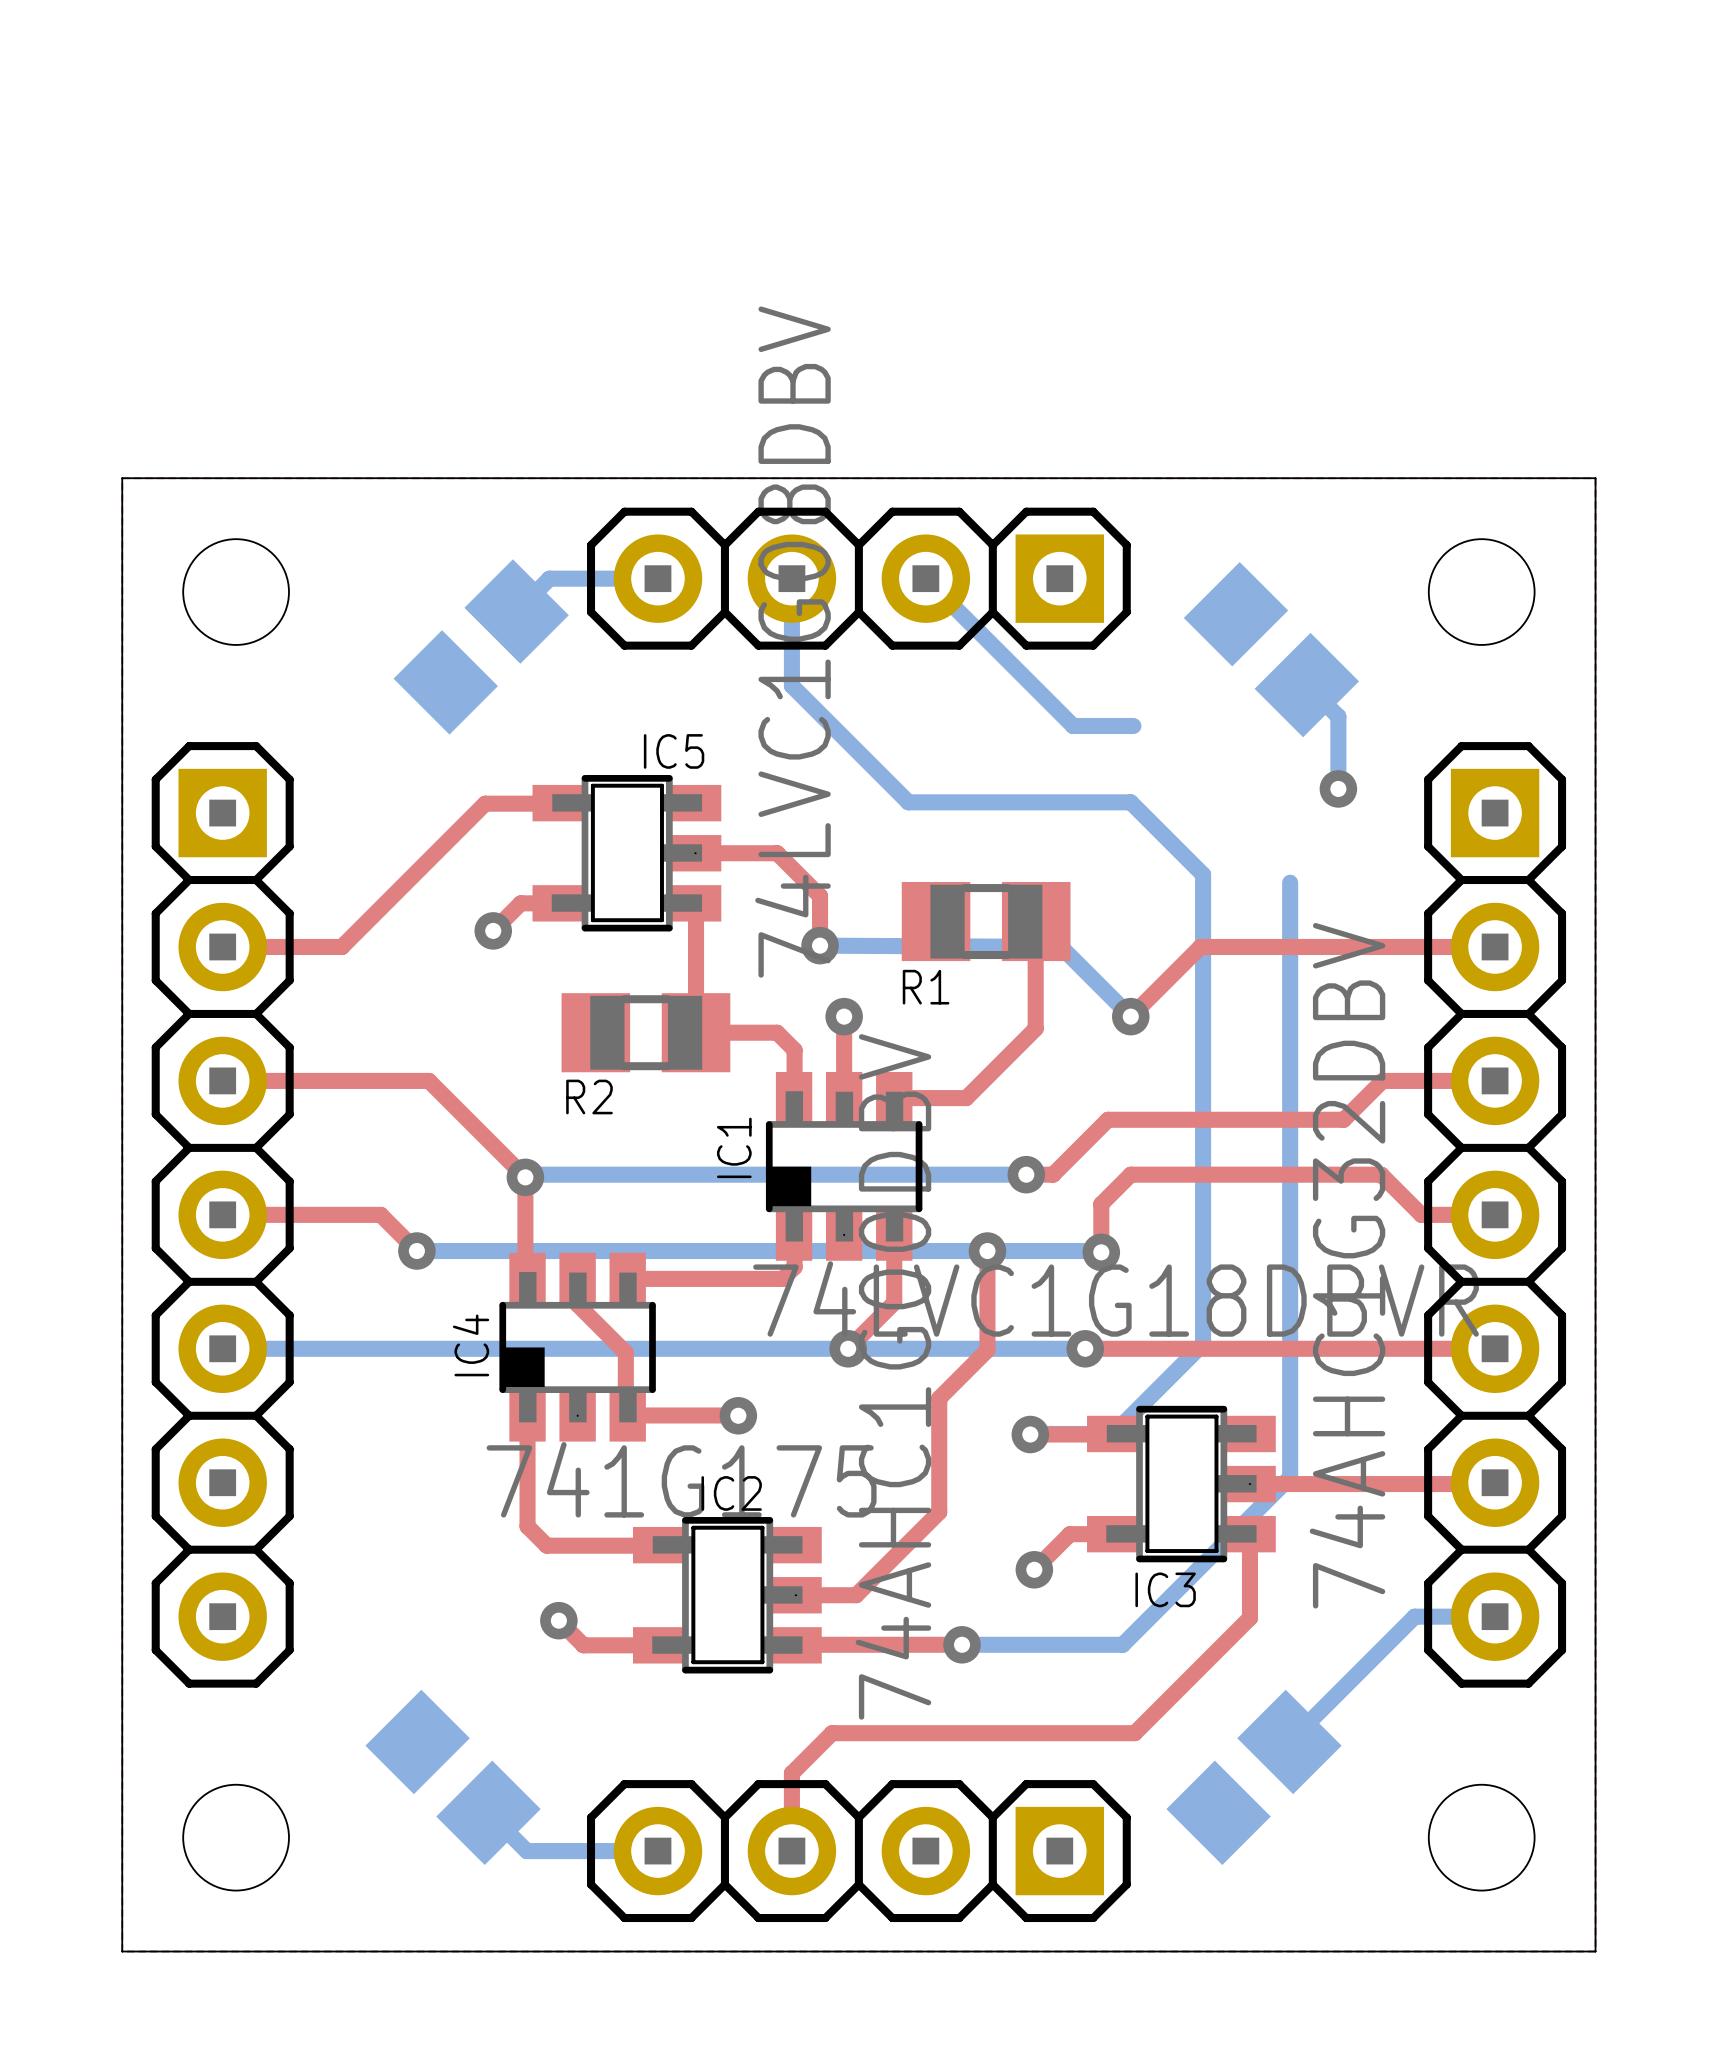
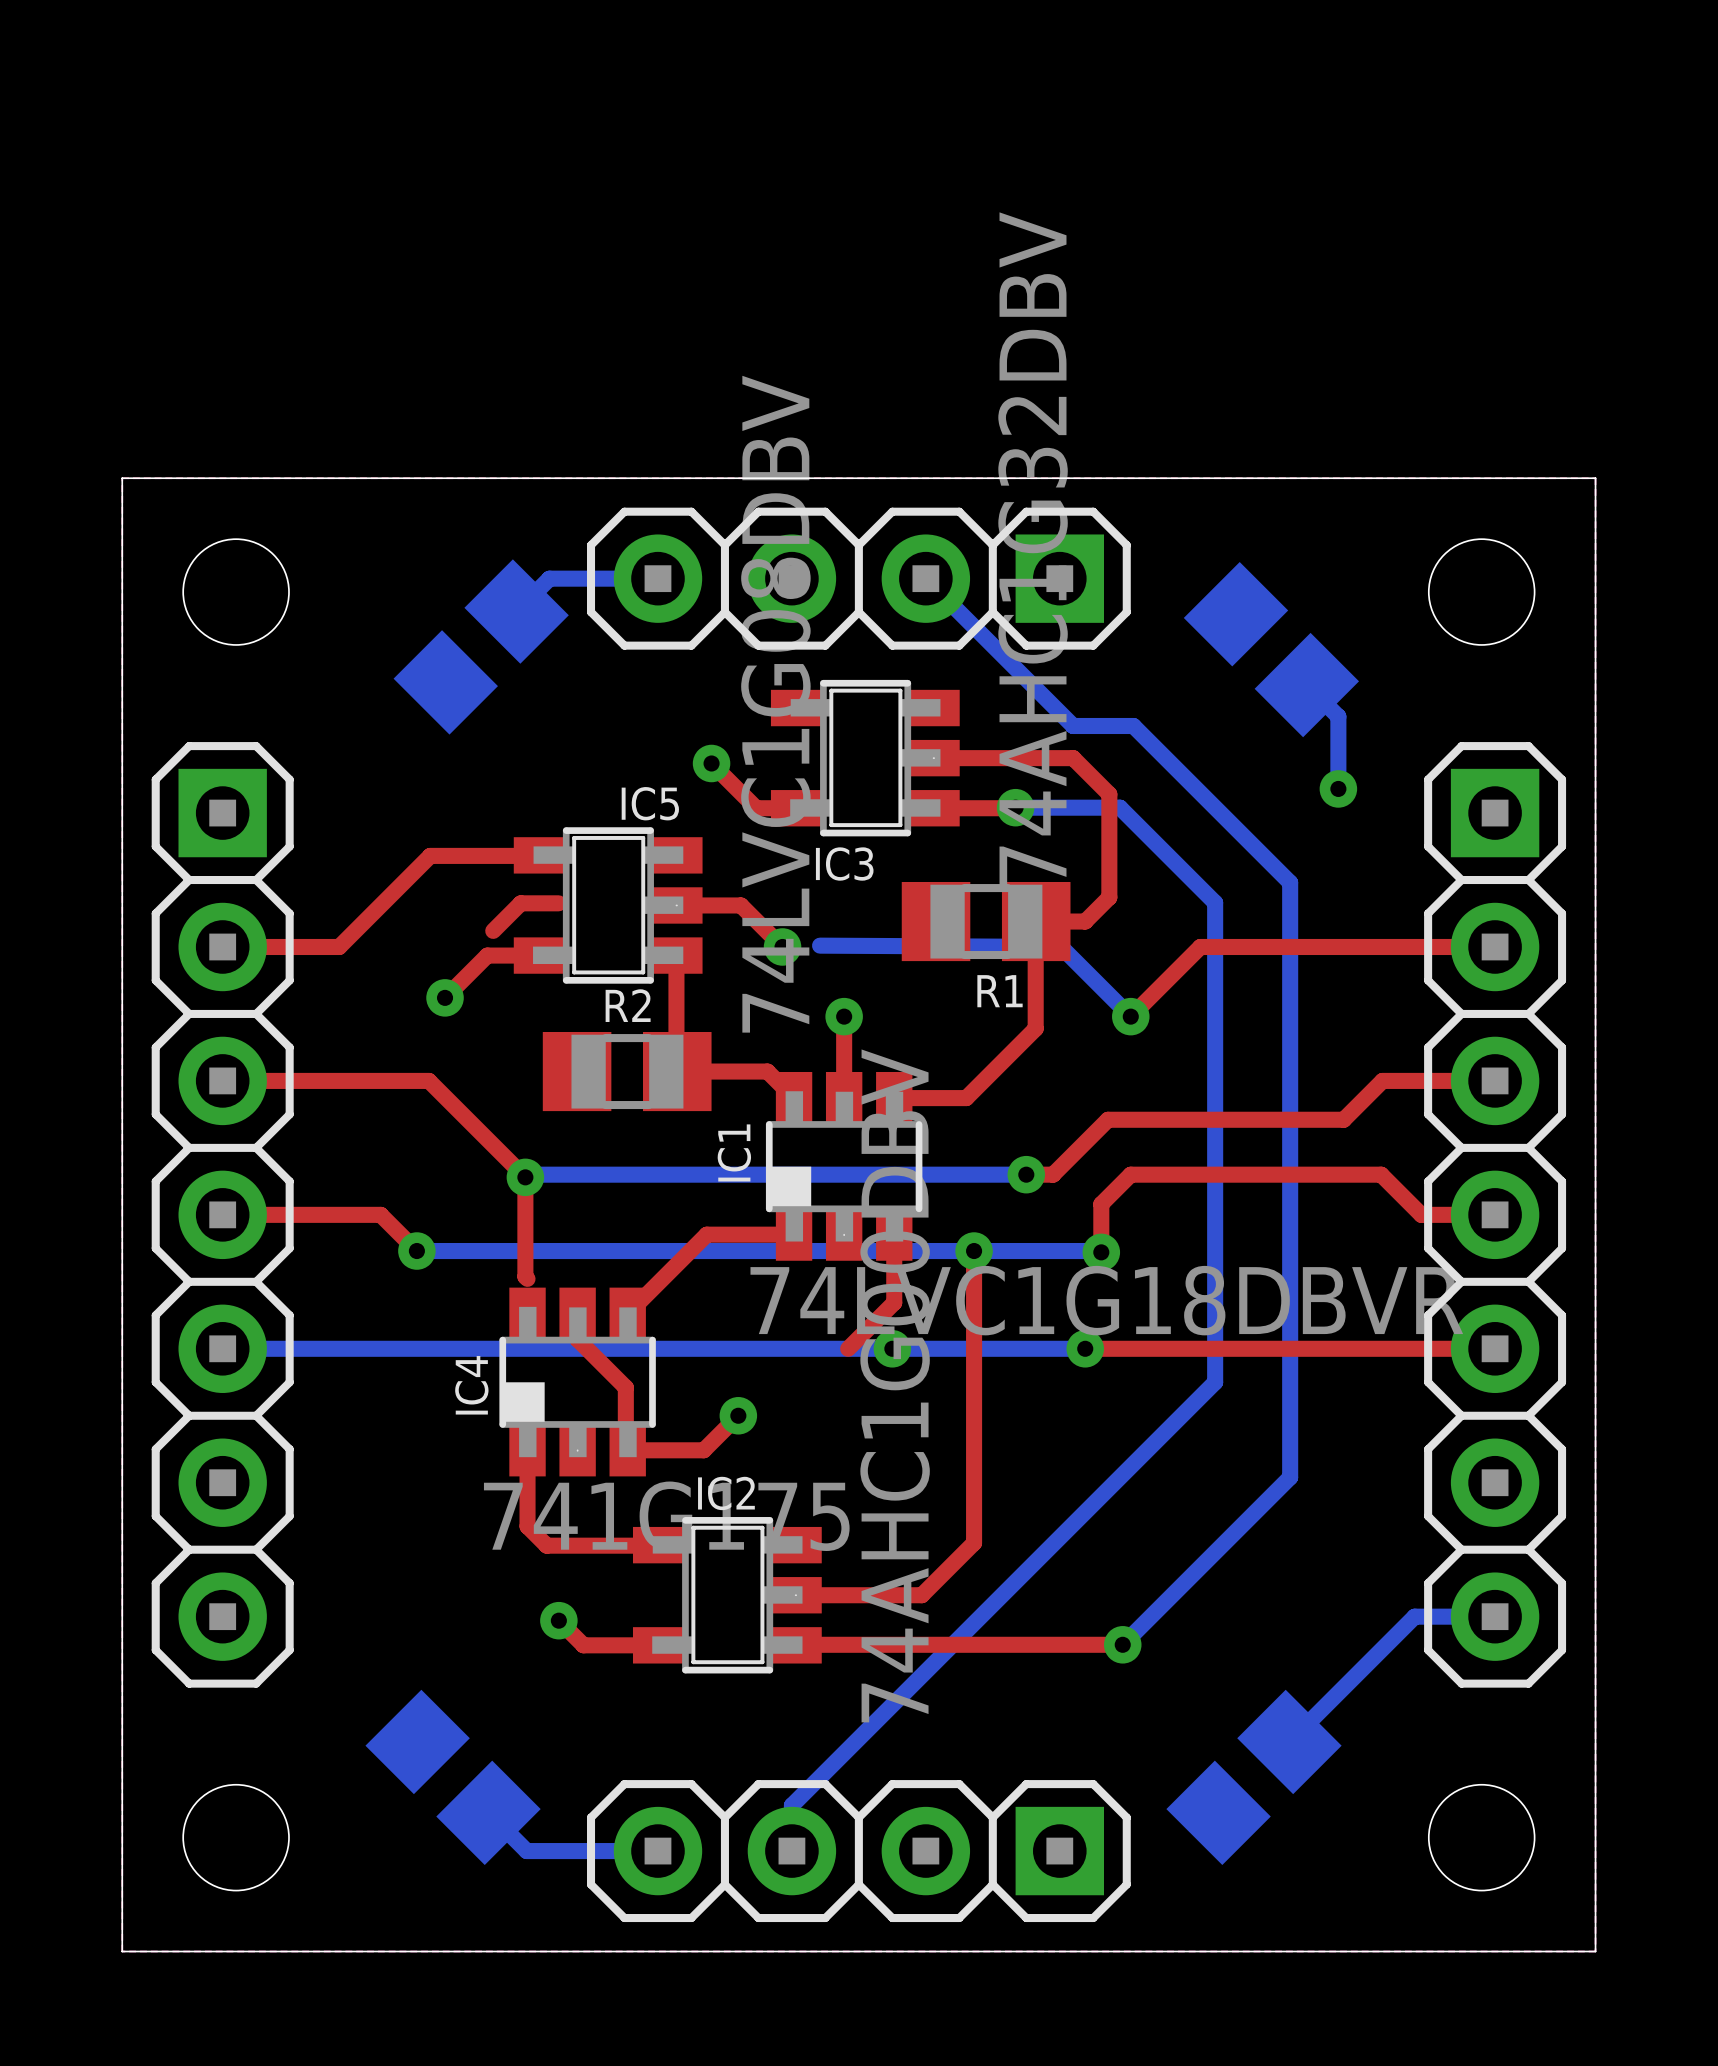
bottom track: (791, 578) (791, 685) (908, 802) (1130, 802) (1203, 874) (1203, 1343) (1113, 1433) (1030, 1433) -> none
bottom track: none -> (1133, 725) (1290, 882)
top track: none -> (933, 758) (1073, 758) (1109, 794) (1109, 897) (1085, 921) (1036, 921)
top track: none -> (711, 763) (756, 808) (797, 808)
via: none -> (711, 763)
top track: (558, 803) (485, 803) (341, 946) (339, 946) -> (539, 855) (430, 855) (339, 946)
bottom track: none -> (1015, 807) (1120, 807) (1215, 902) (1215, 1382) (791, 1805) (791, 1851)
via: none -> (1015, 807)
IC5 position: (626, 853) -> (608, 905)
top track: (695, 853) (777, 853) (820, 896) (820, 945) -> none
top track: (695, 903) (696, 1032) (777, 1032) (794, 1050) (794, 1097) -> (676, 955) (676, 1070) (767, 1071) (794, 1098)
top track: none -> (676, 905) (741, 905) (782, 946)
via position: (493, 930) -> (445, 997)
via position: (820, 945) -> (782, 946)
top track: none -> (539, 955) (487, 955) (445, 997)
R1 name position: R1 (926, 987) -> R1 (1000, 991)
R2 position: (645, 1032) -> (627, 1071)
R2 name position: R2 (589, 1096) -> R2 (628, 1005)
top track: (794, 1235) (794, 1267) (782, 1278) (627, 1278) -> (794, 1234) (706, 1234) (627, 1313)
top track: (987, 1251) (987, 1350) (939, 1398) (939, 1512) (856, 1595) -> (974, 1251) (974, 1543) (921, 1595) (856, 1595)
via position: (987, 1251) -> (974, 1251)
top track: (577, 1278) (577, 1304) (625, 1352) (625, 1387) -> (577, 1313) (577, 1339) (625, 1387)
IC4 position: (577, 1347) -> (577, 1382)
via position: (848, 1348) -> (892, 1348)
top track: (625, 1413) (627, 1415) (738, 1415) -> (625, 1413) (625, 1448) (627, 1450) (703, 1450) (738, 1415)
top track: (1030, 1434) (1112, 1434) -> (933, 808) (1015, 808)
via: (1030, 1434) -> none
top track: (1495, 1482) (1249, 1484) -> none
IC3 position: (1181, 1484) -> (865, 758)
top track: (1113, 1534) (1069, 1534) (1034, 1569) -> none
top track: (1249, 1534) (1249, 1618) (1134, 1733) (832, 1733) (791, 1773) (791, 1851) -> none
via: (1034, 1569) -> none
bottom track: (962, 1644) (1122, 1644) -> none
top track: none -> (962, 1644) (1122, 1644)
via: (962, 1644) -> none
via: none -> (1122, 1644)

